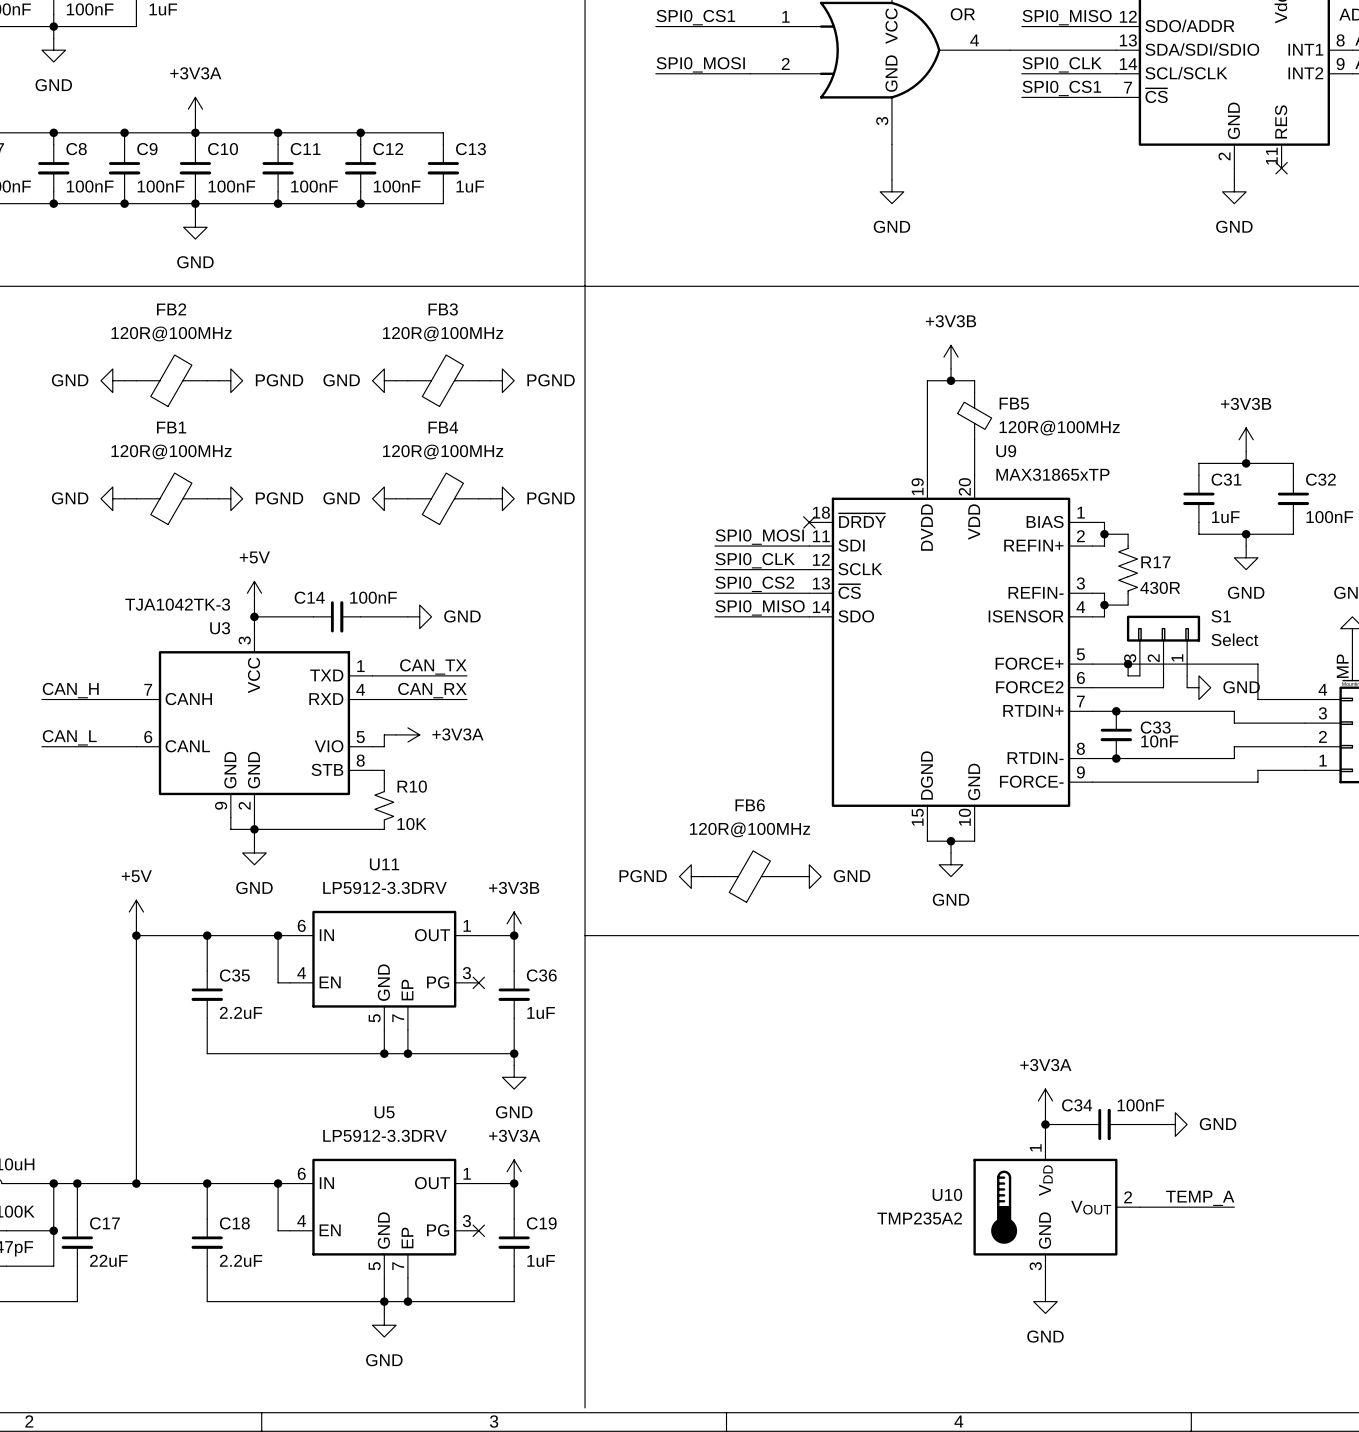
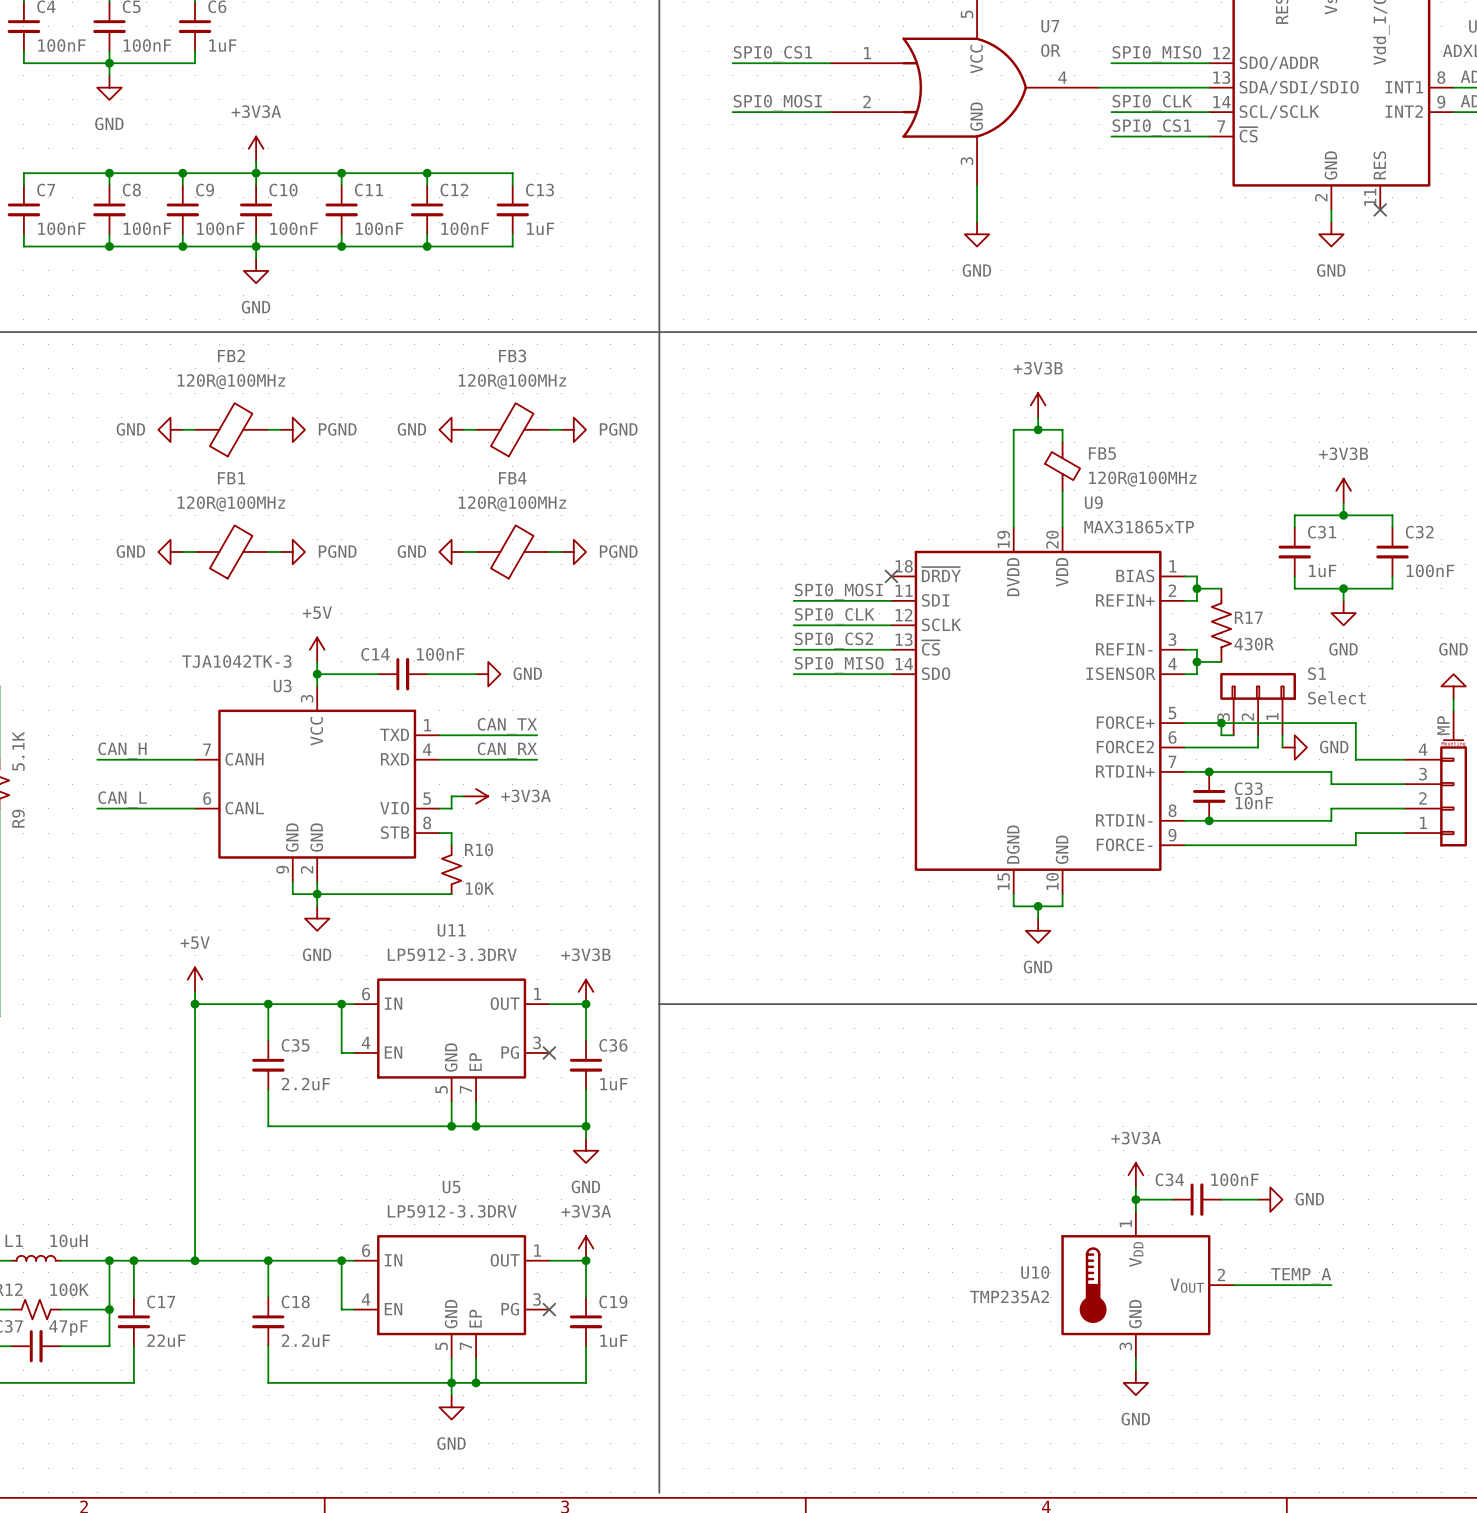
power symbol: PGND (691, 876) -> none
wire: (703, 876) (714, 876) -> none
FB6: 120R@100MHz (750, 876) -> none
wire: (785, 876) (797, 876) -> none
power symbol: GND (809, 876) -> none

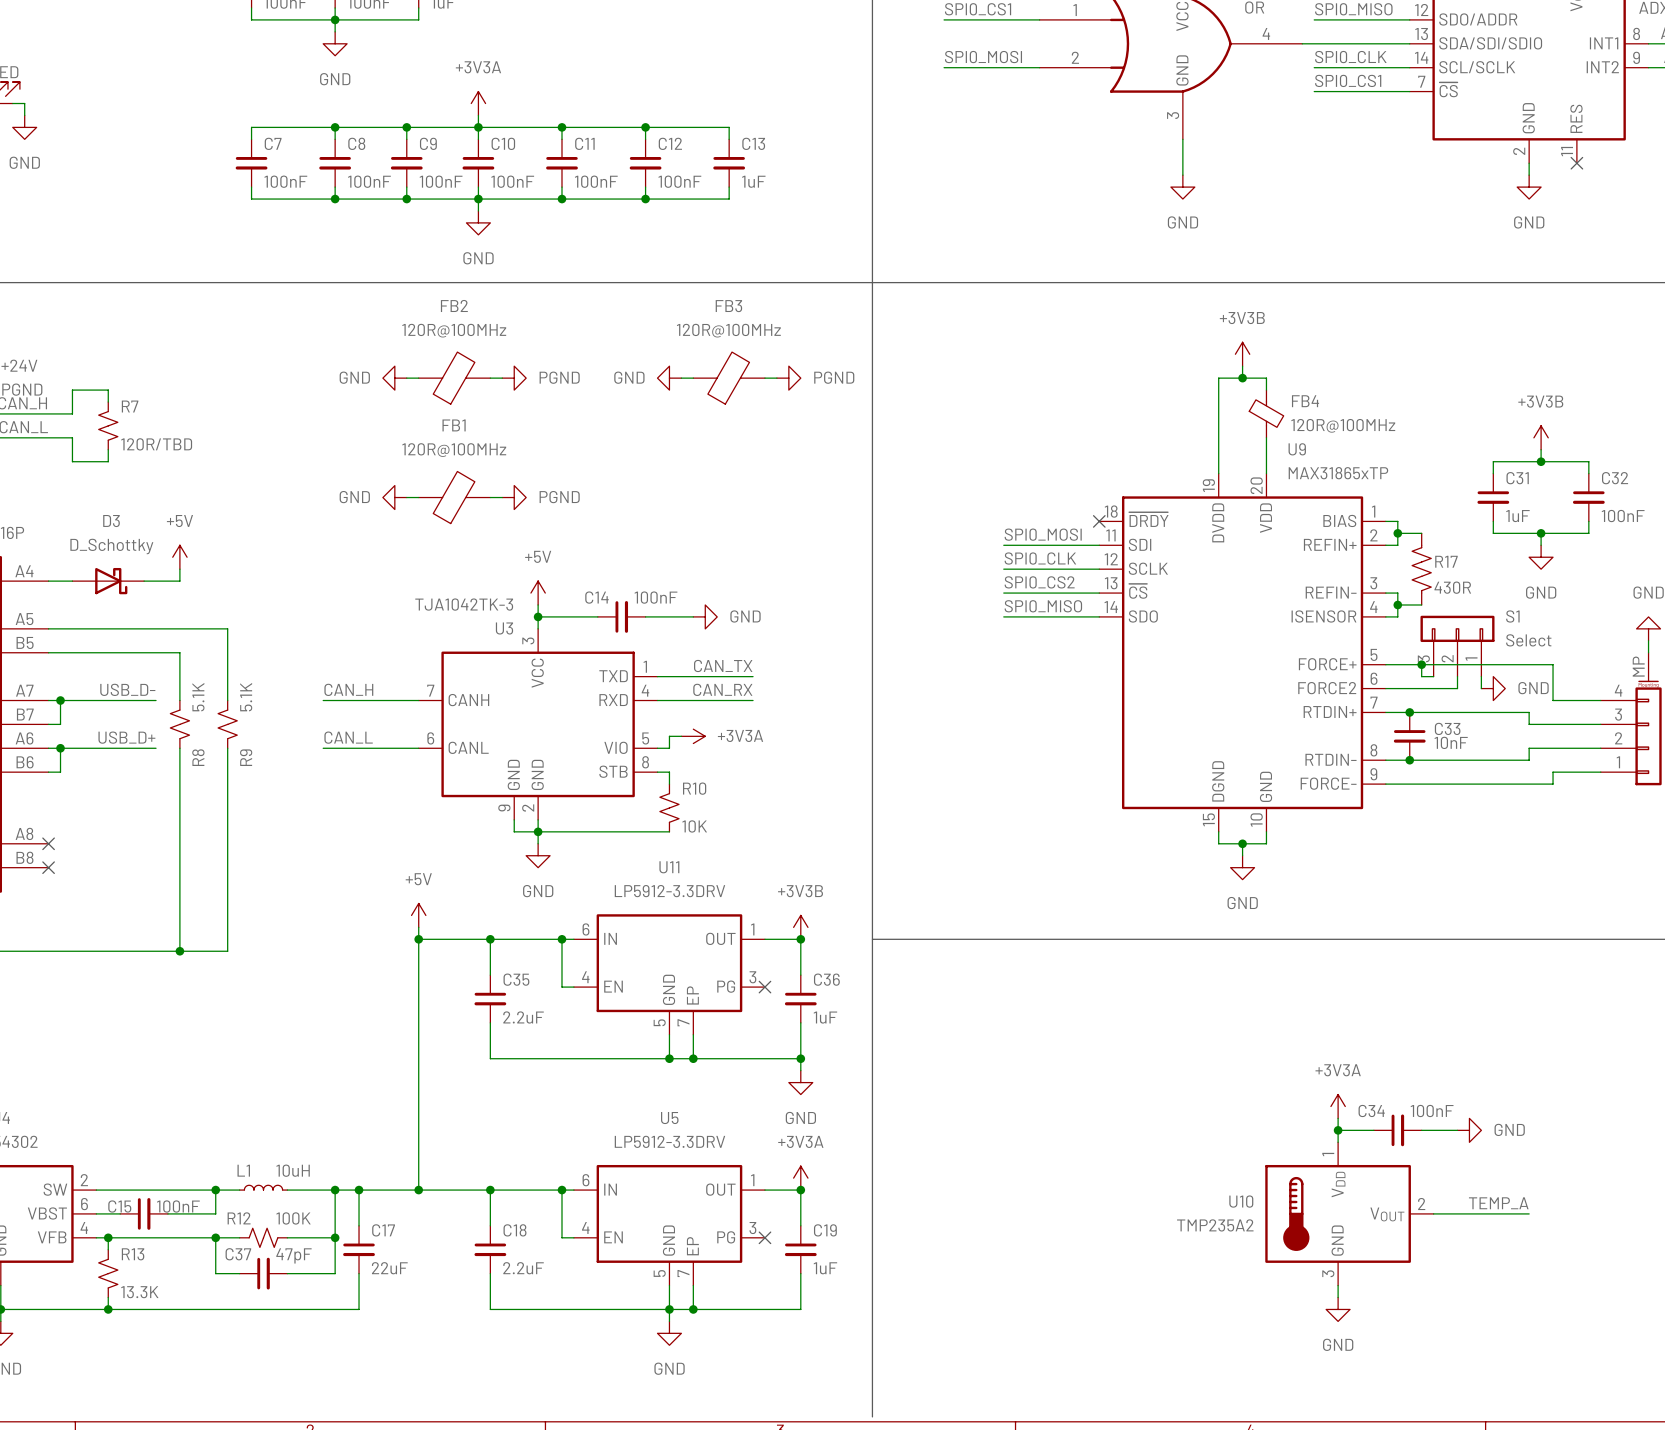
FB5 name: FB5 (1102, 453) -> FB4 (1305, 401)
power symbol: GND (451, 552) -> none
wire: (463, 552) (476, 552) -> none
FB4: 120R@100MHz (512, 552) -> none
wire: (549, 552) (561, 552) -> none
power symbol: PGND (573, 552) -> none

